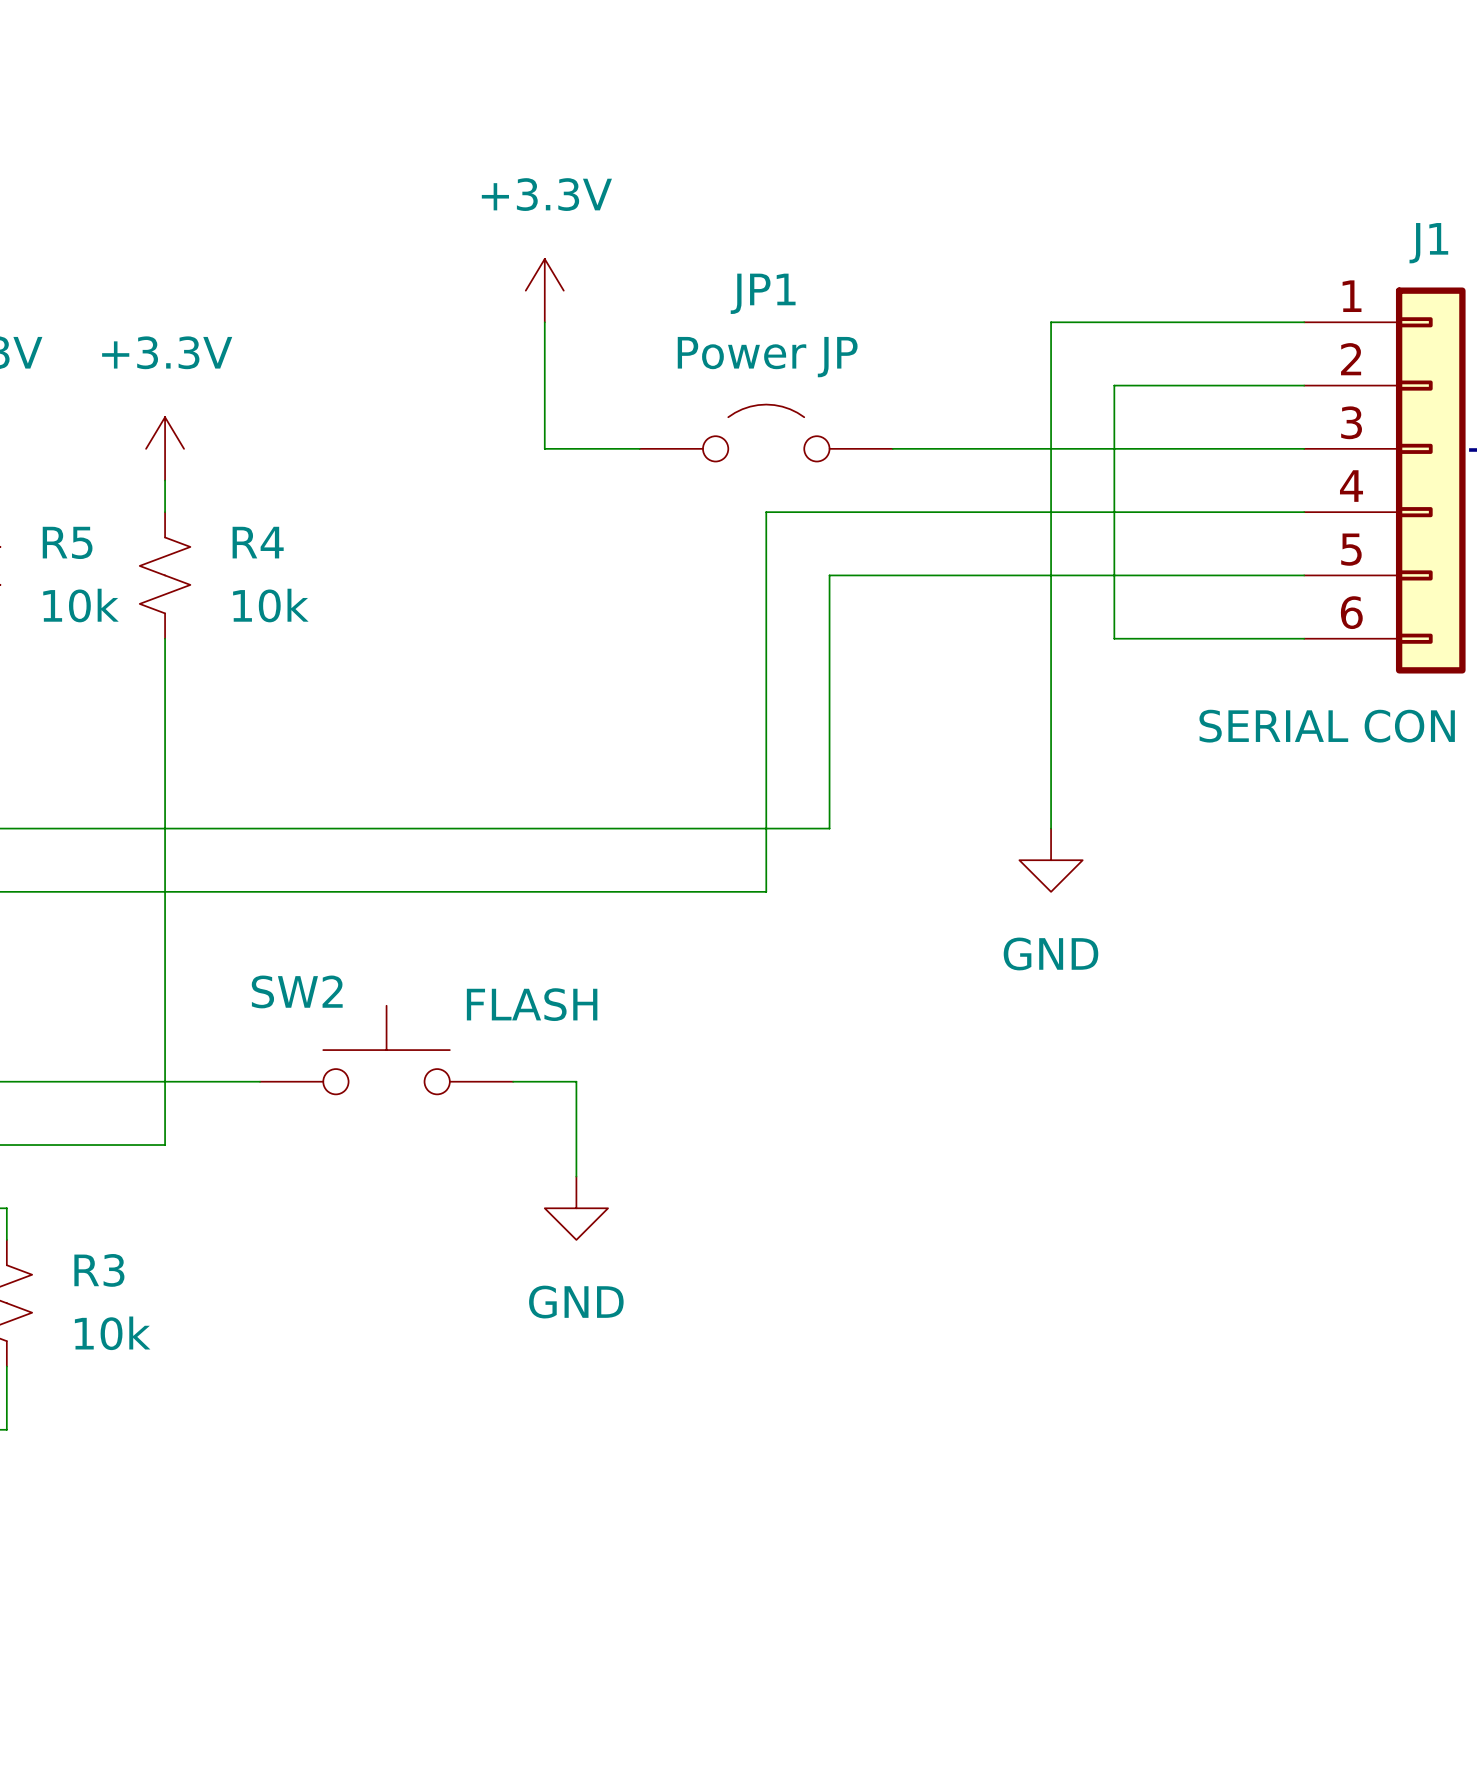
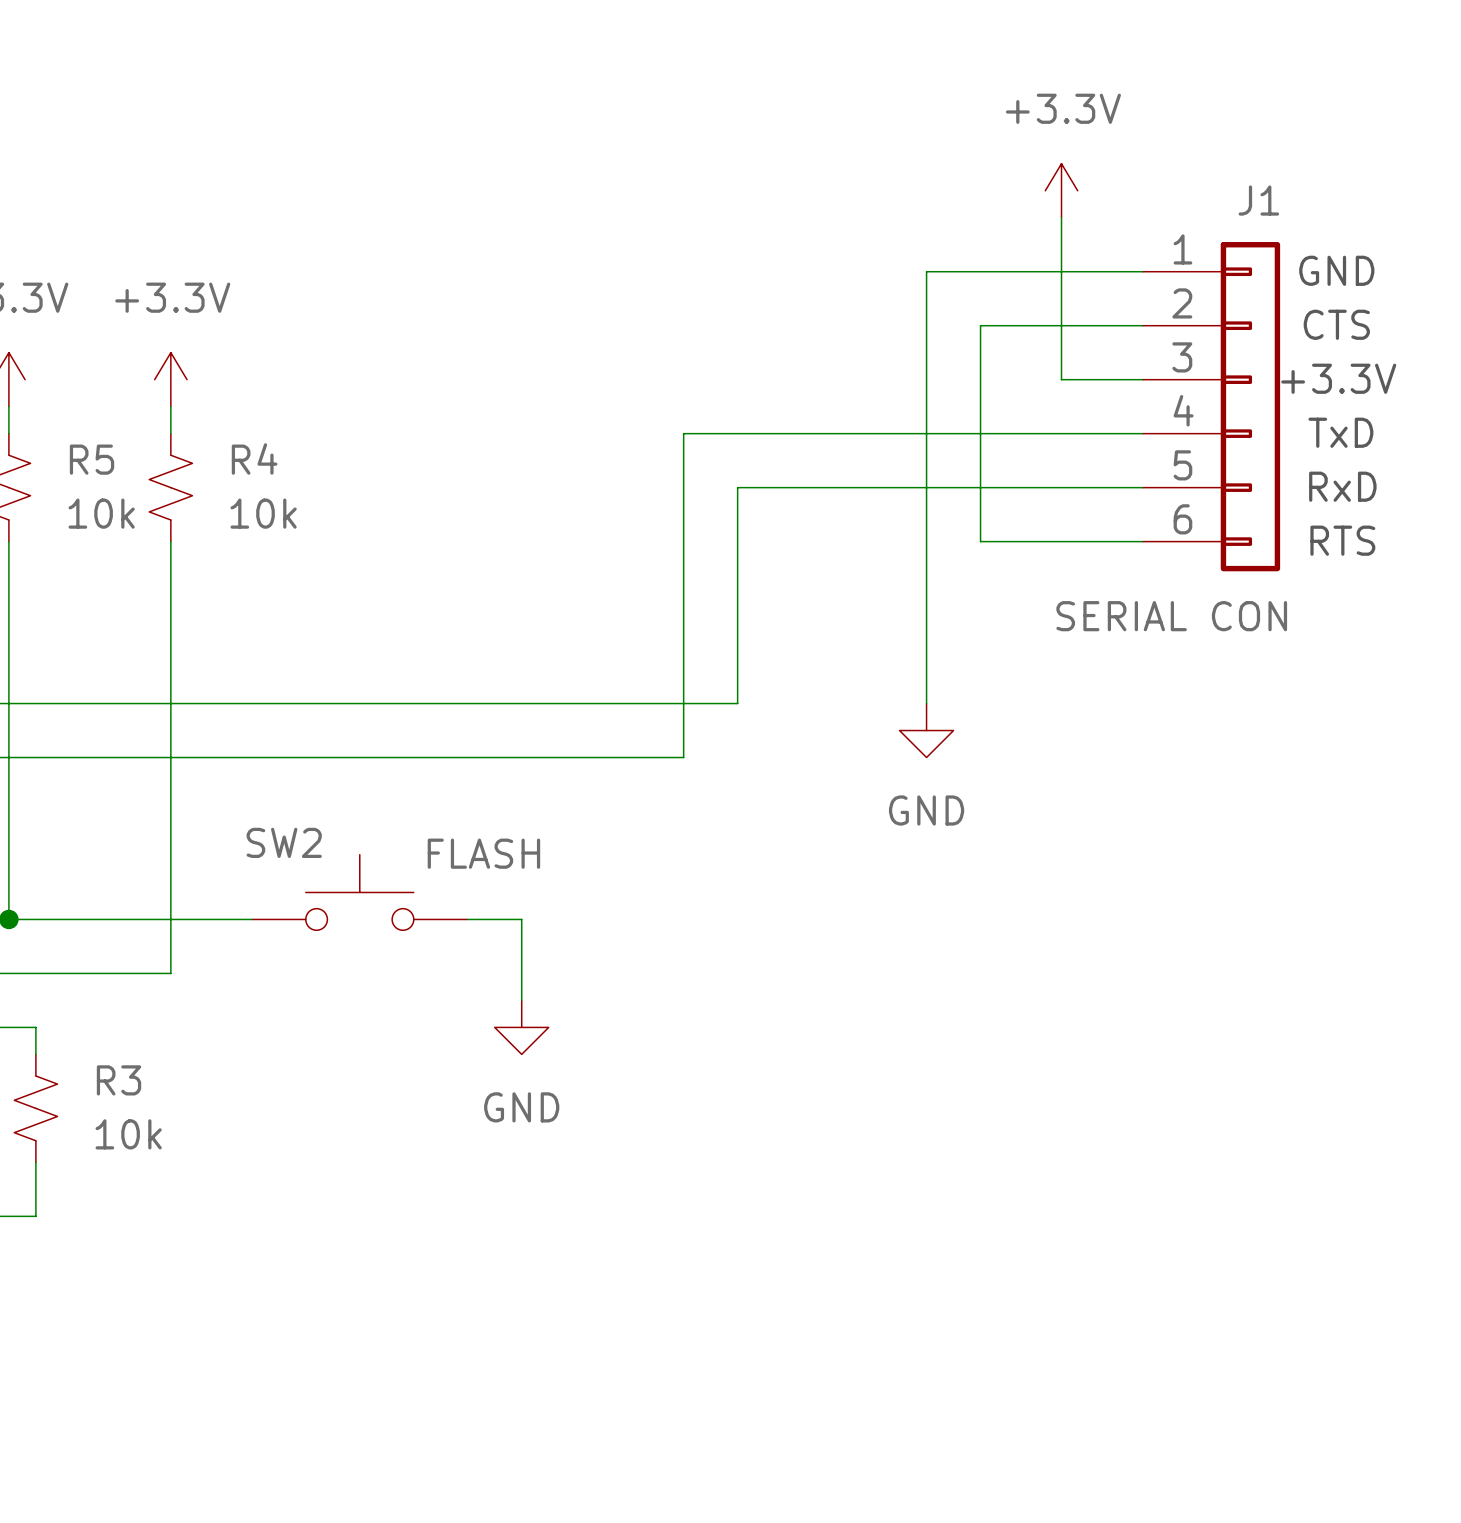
power symbol: none -> +3.3V (1061, 190)
power symbol: +3.3V (544, 290) -> none
wire: (544, 322) (544, 448) (639, 448) -> none
JP1: Power JP (766, 433) -> none
wire: (892, 448) (1209, 448) -> (1061, 217) (1061, 379)

